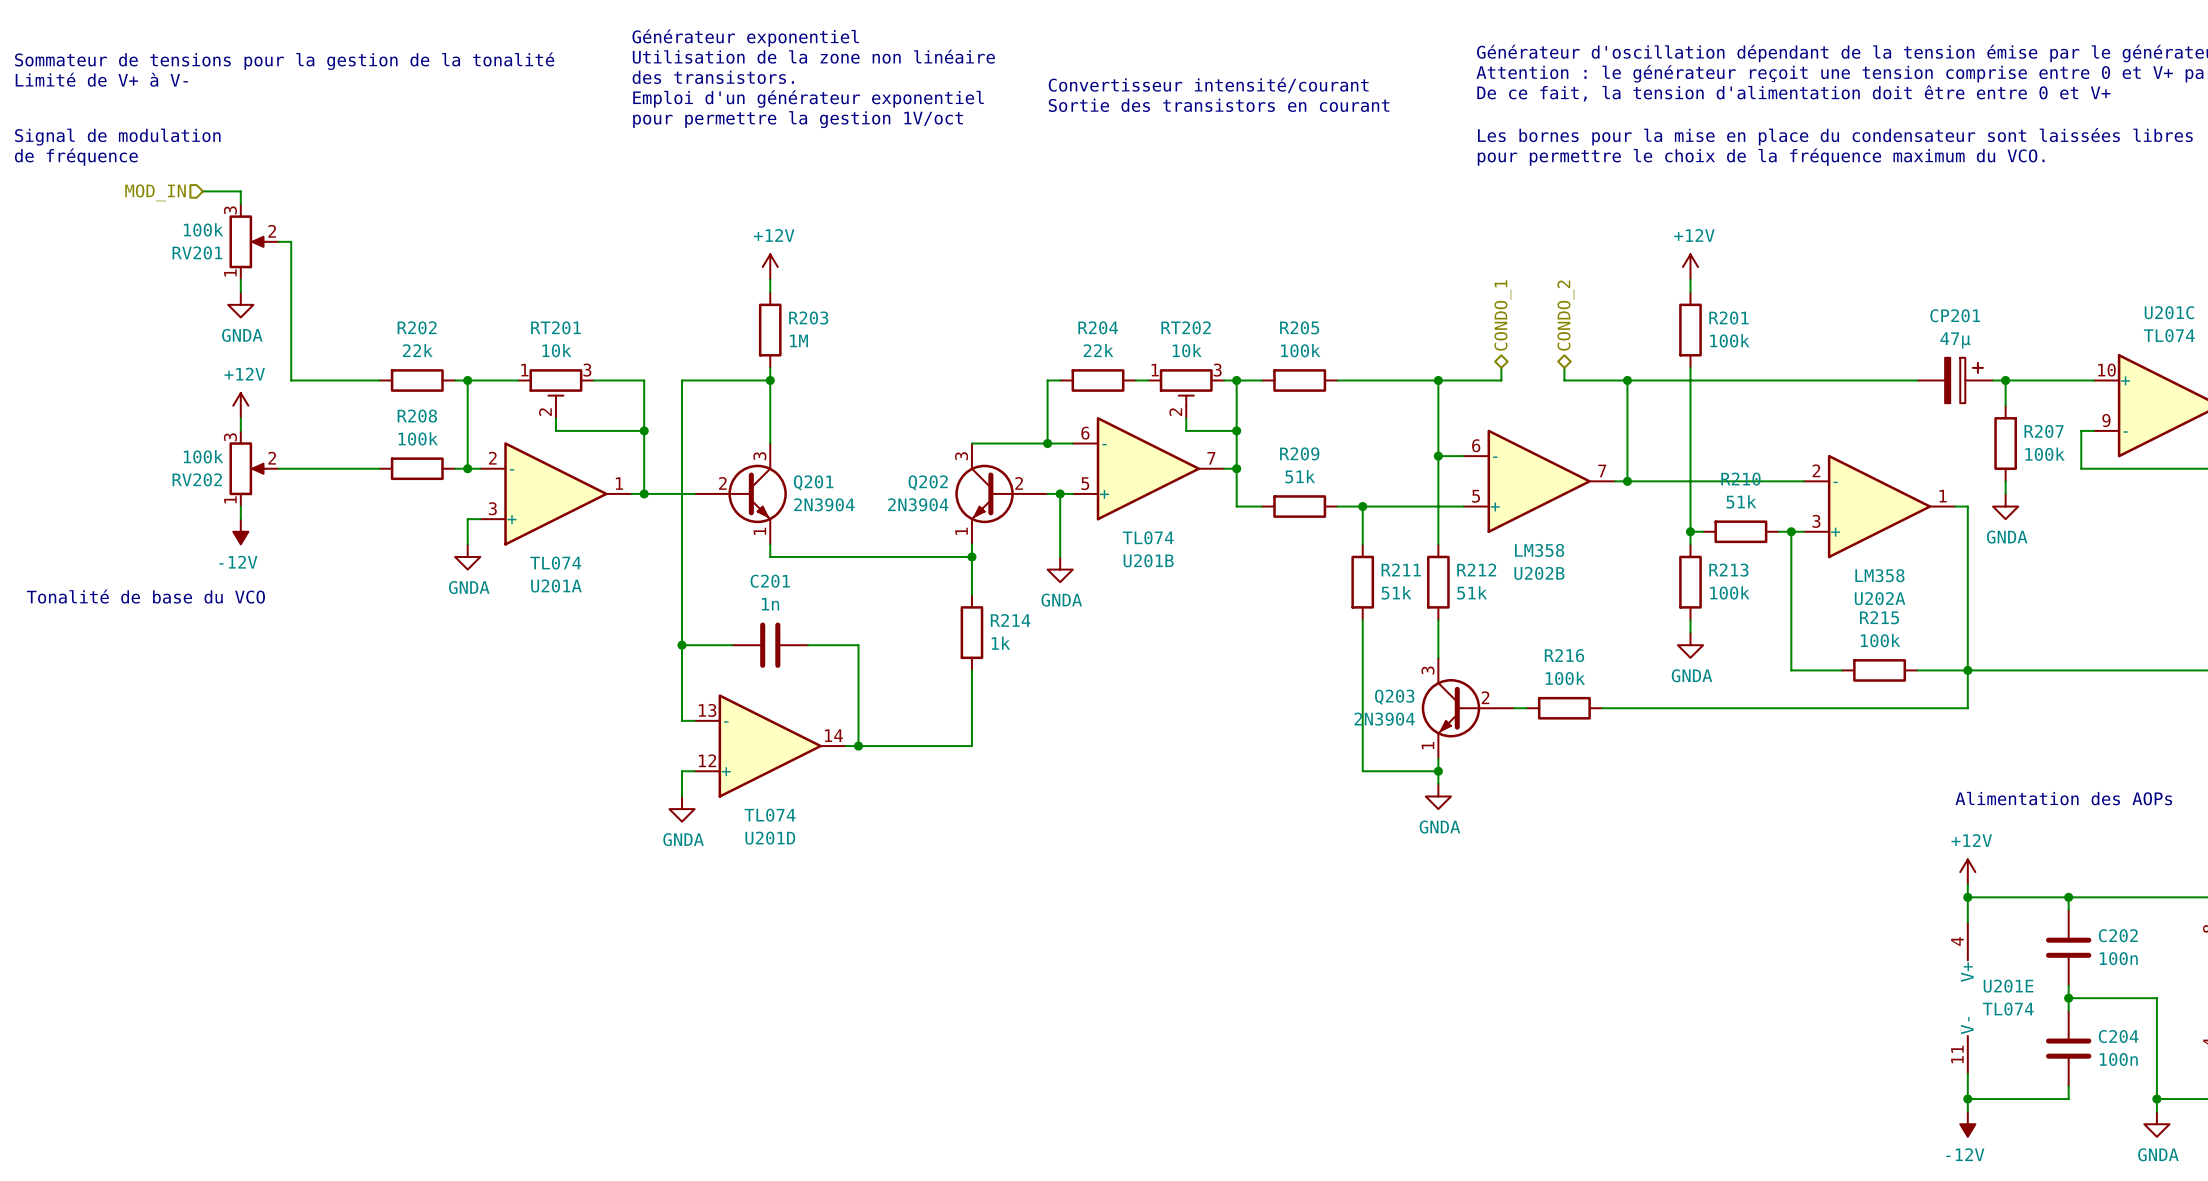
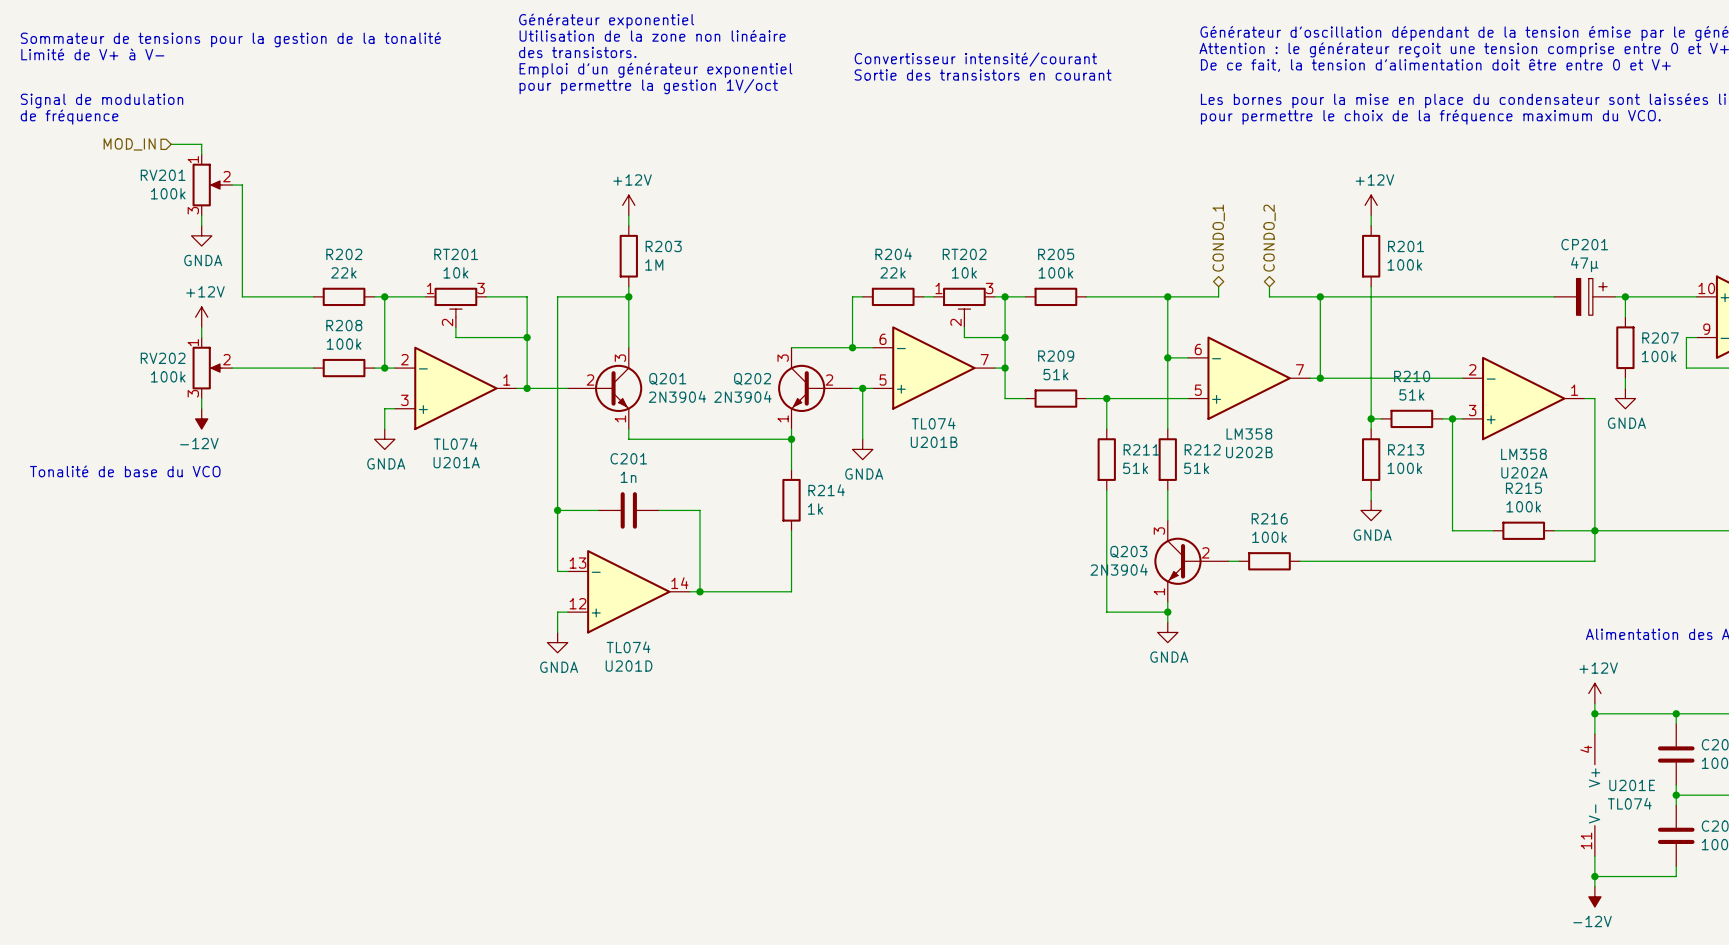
RV201 flip: as is (247, 241) -> up-down (207, 185)
RV202 flip: as is (247, 468) -> up-down (207, 368)

